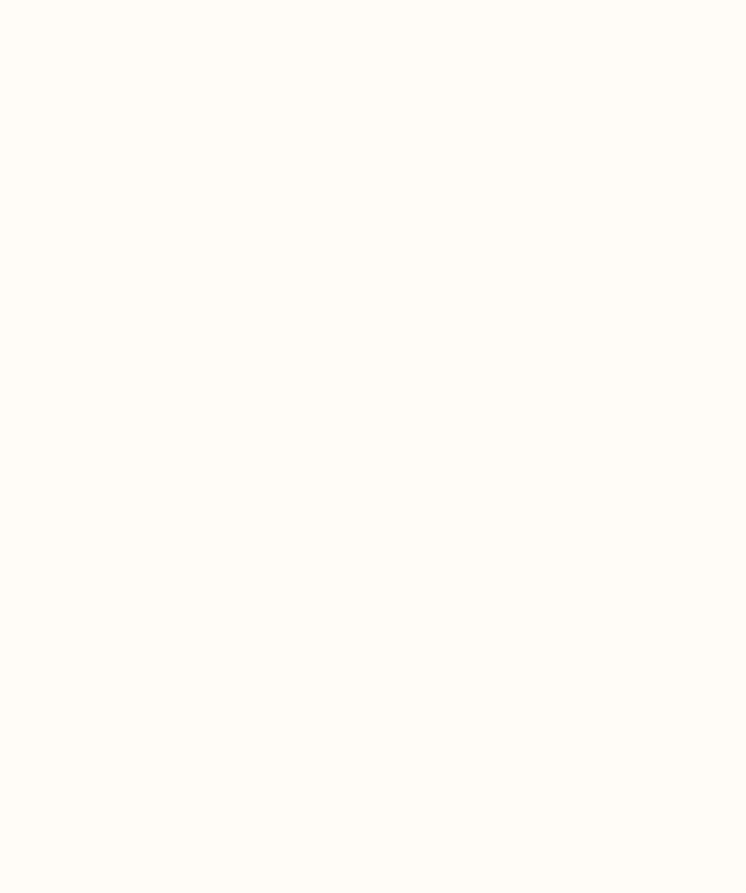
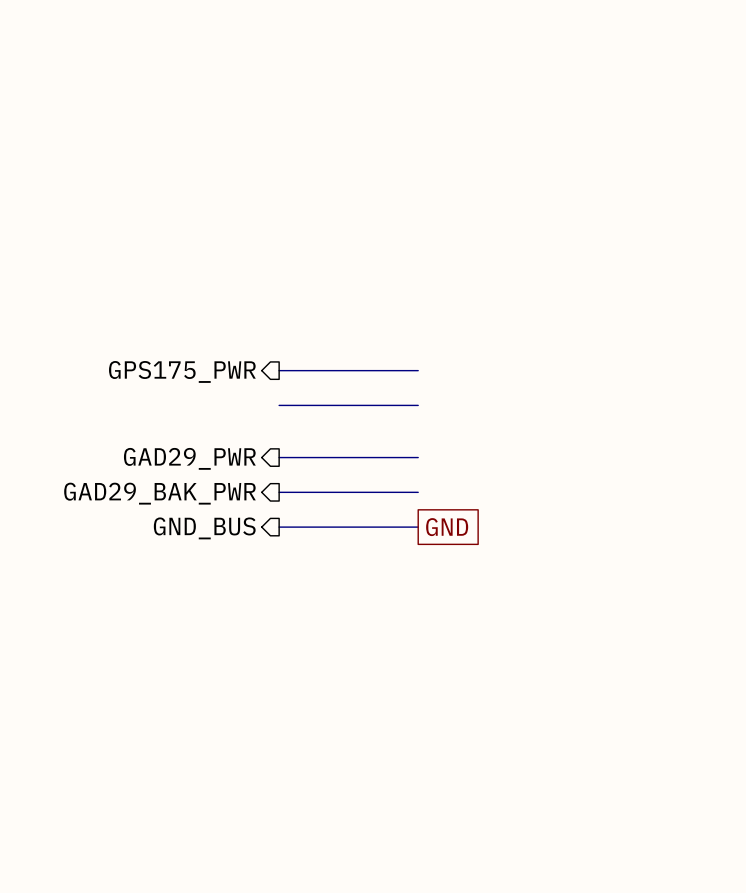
wire: none -> (279, 370) (418, 370)
sheet pin: none -> GPS175_PWR (182, 371)
wire: none -> (279, 405) (418, 405)
wire: none -> (279, 457) (418, 457)
sheet pin: none -> GAD29_PWR (189, 458)
wire: none -> (279, 492) (418, 492)
sheet pin: none -> GAD29_BAK_PWR (159, 493)
wire: none -> (279, 527) (418, 527)
global label: none -> GND (447, 527)
sheet pin: none -> GND_BUS (204, 528)

